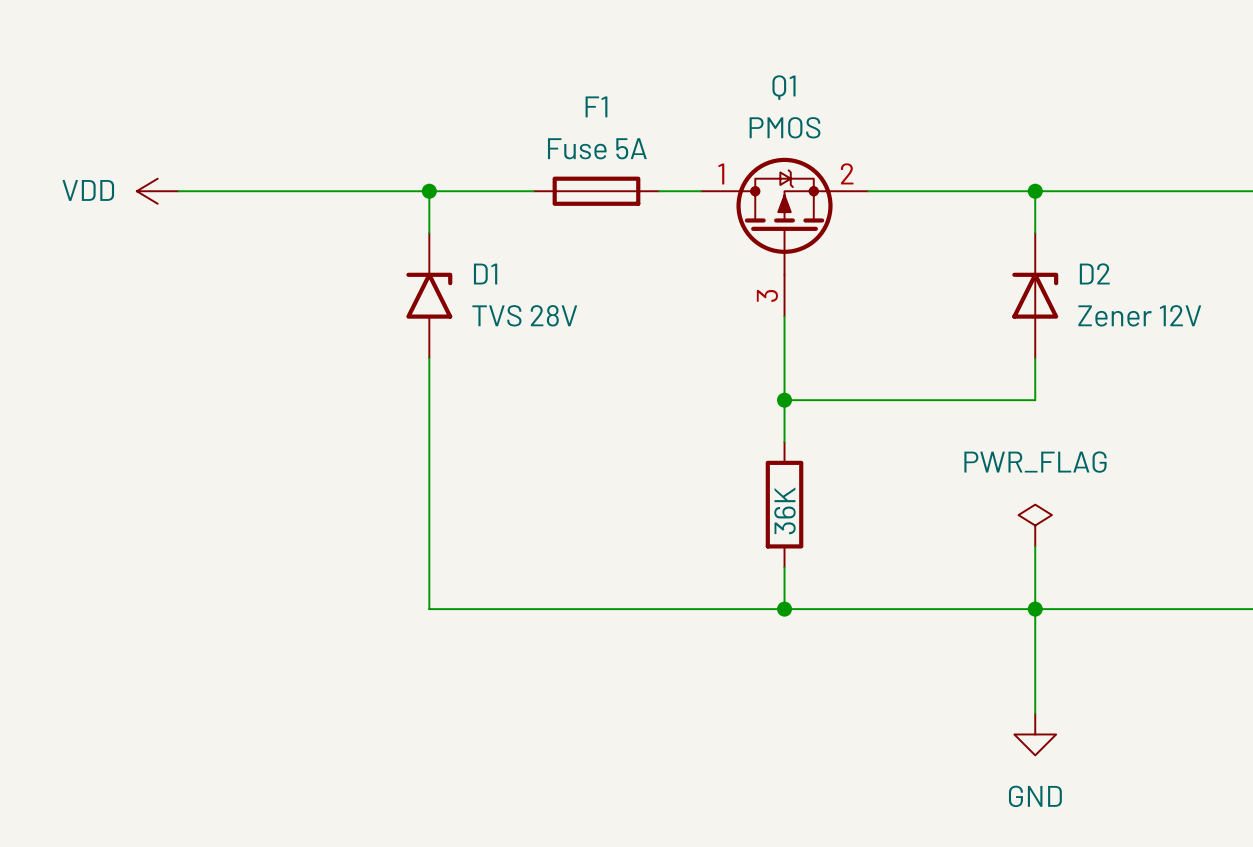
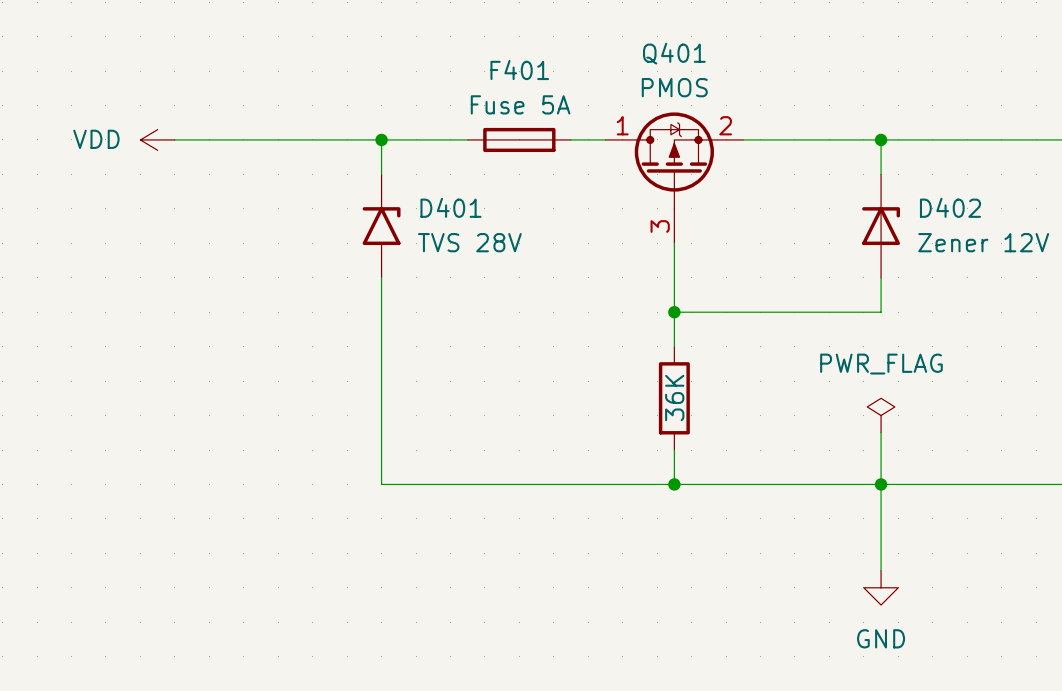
Q1 name: Q1 (784, 87) -> Q401 (674, 53)
F1 name: F1 (596, 106) -> F401 (519, 70)
D2 name: D2 (1094, 273) -> D402 (950, 207)
D1 name: D1 (485, 274) -> D401 (451, 207)

